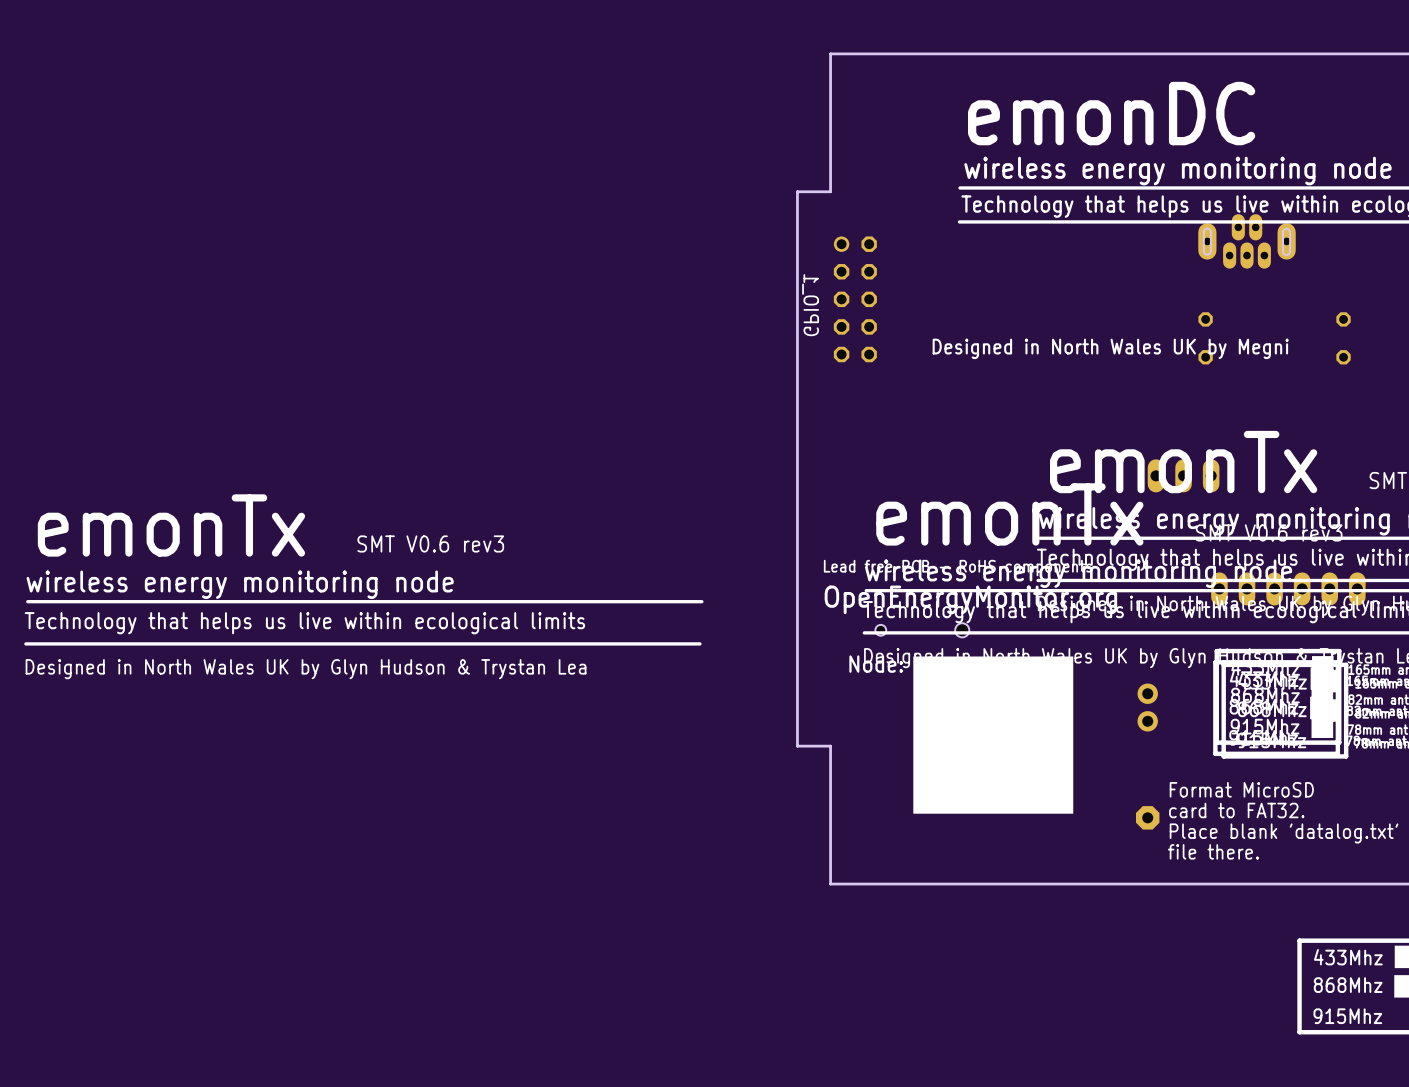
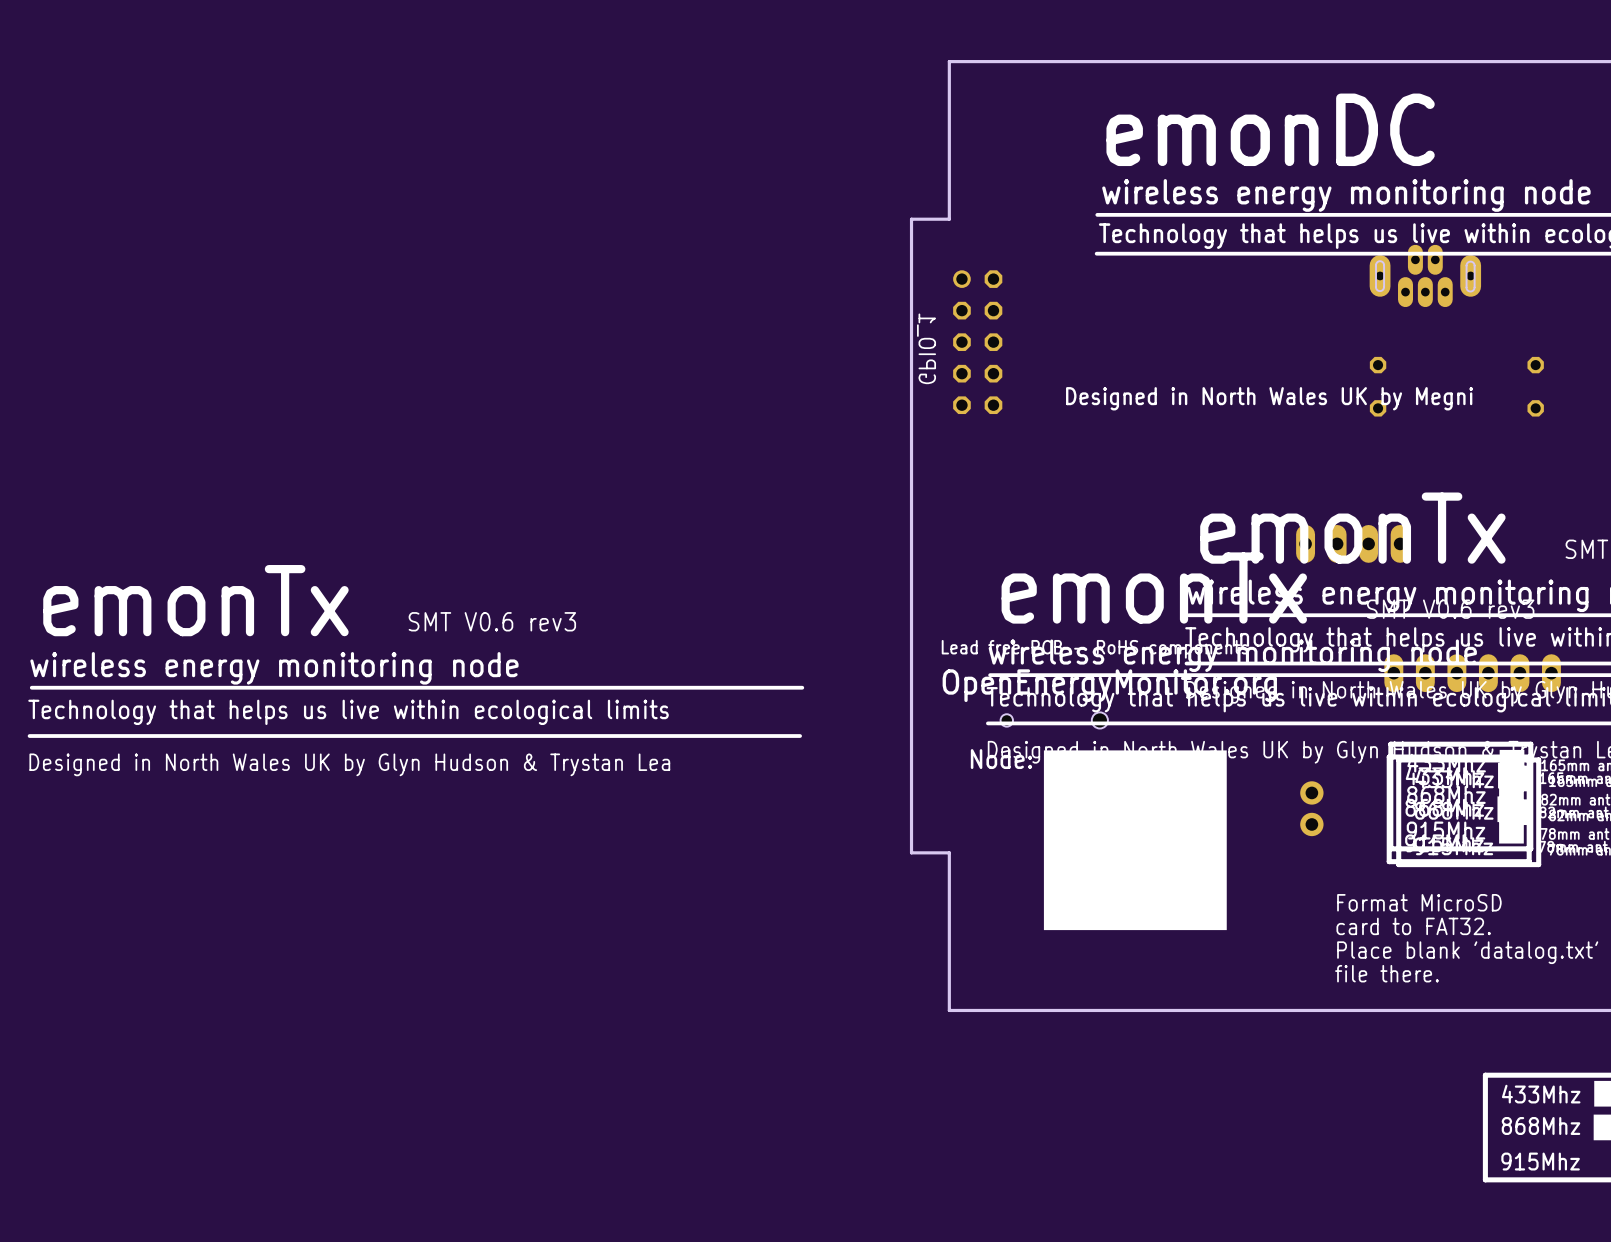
part footprint: [1147, 459, 1220, 493] -> [1296, 524, 1410, 563]
part: (1147, 817) -> none

